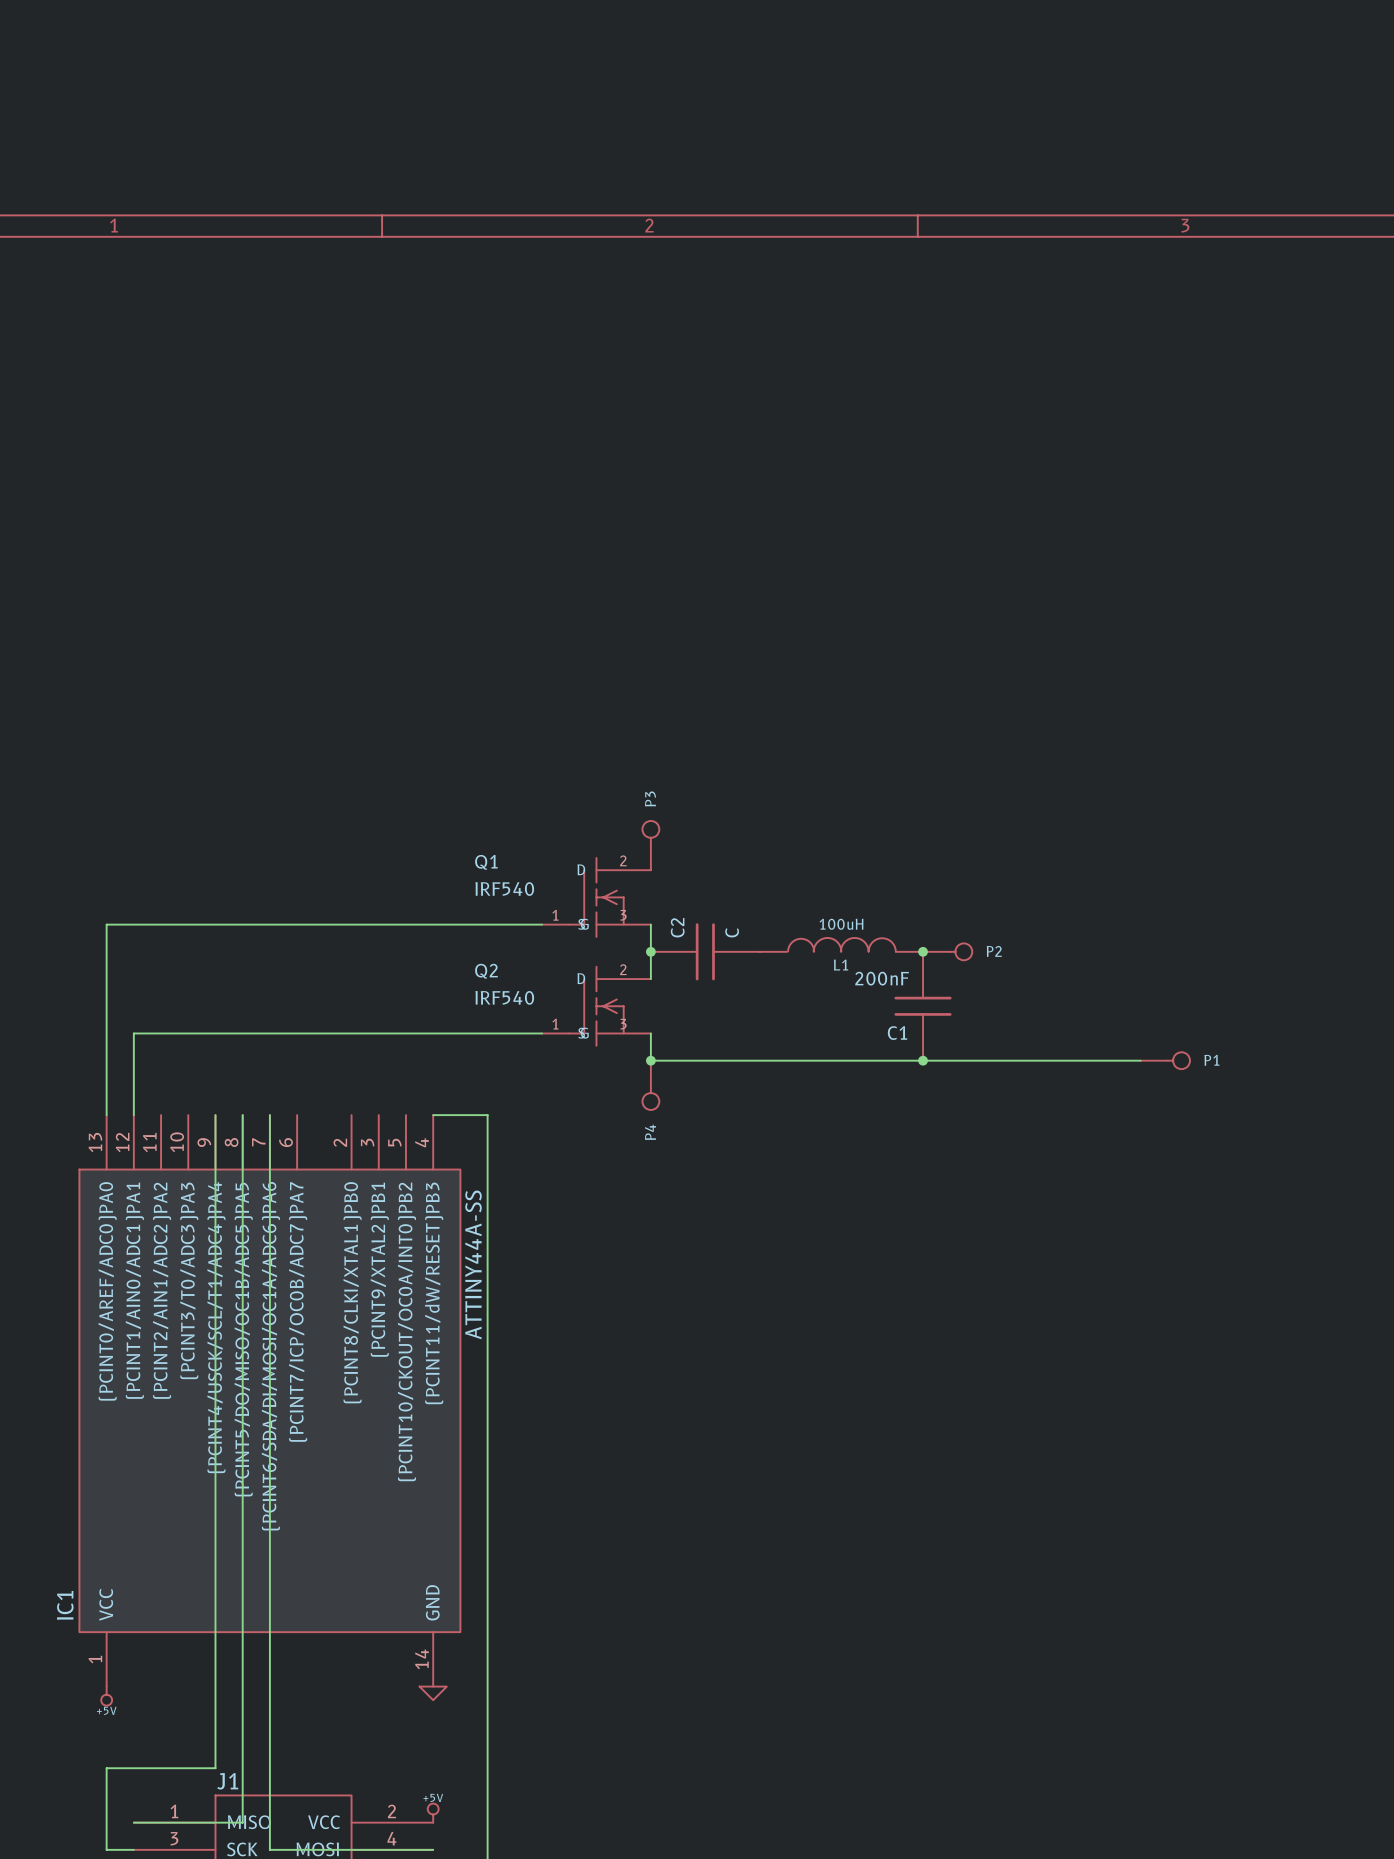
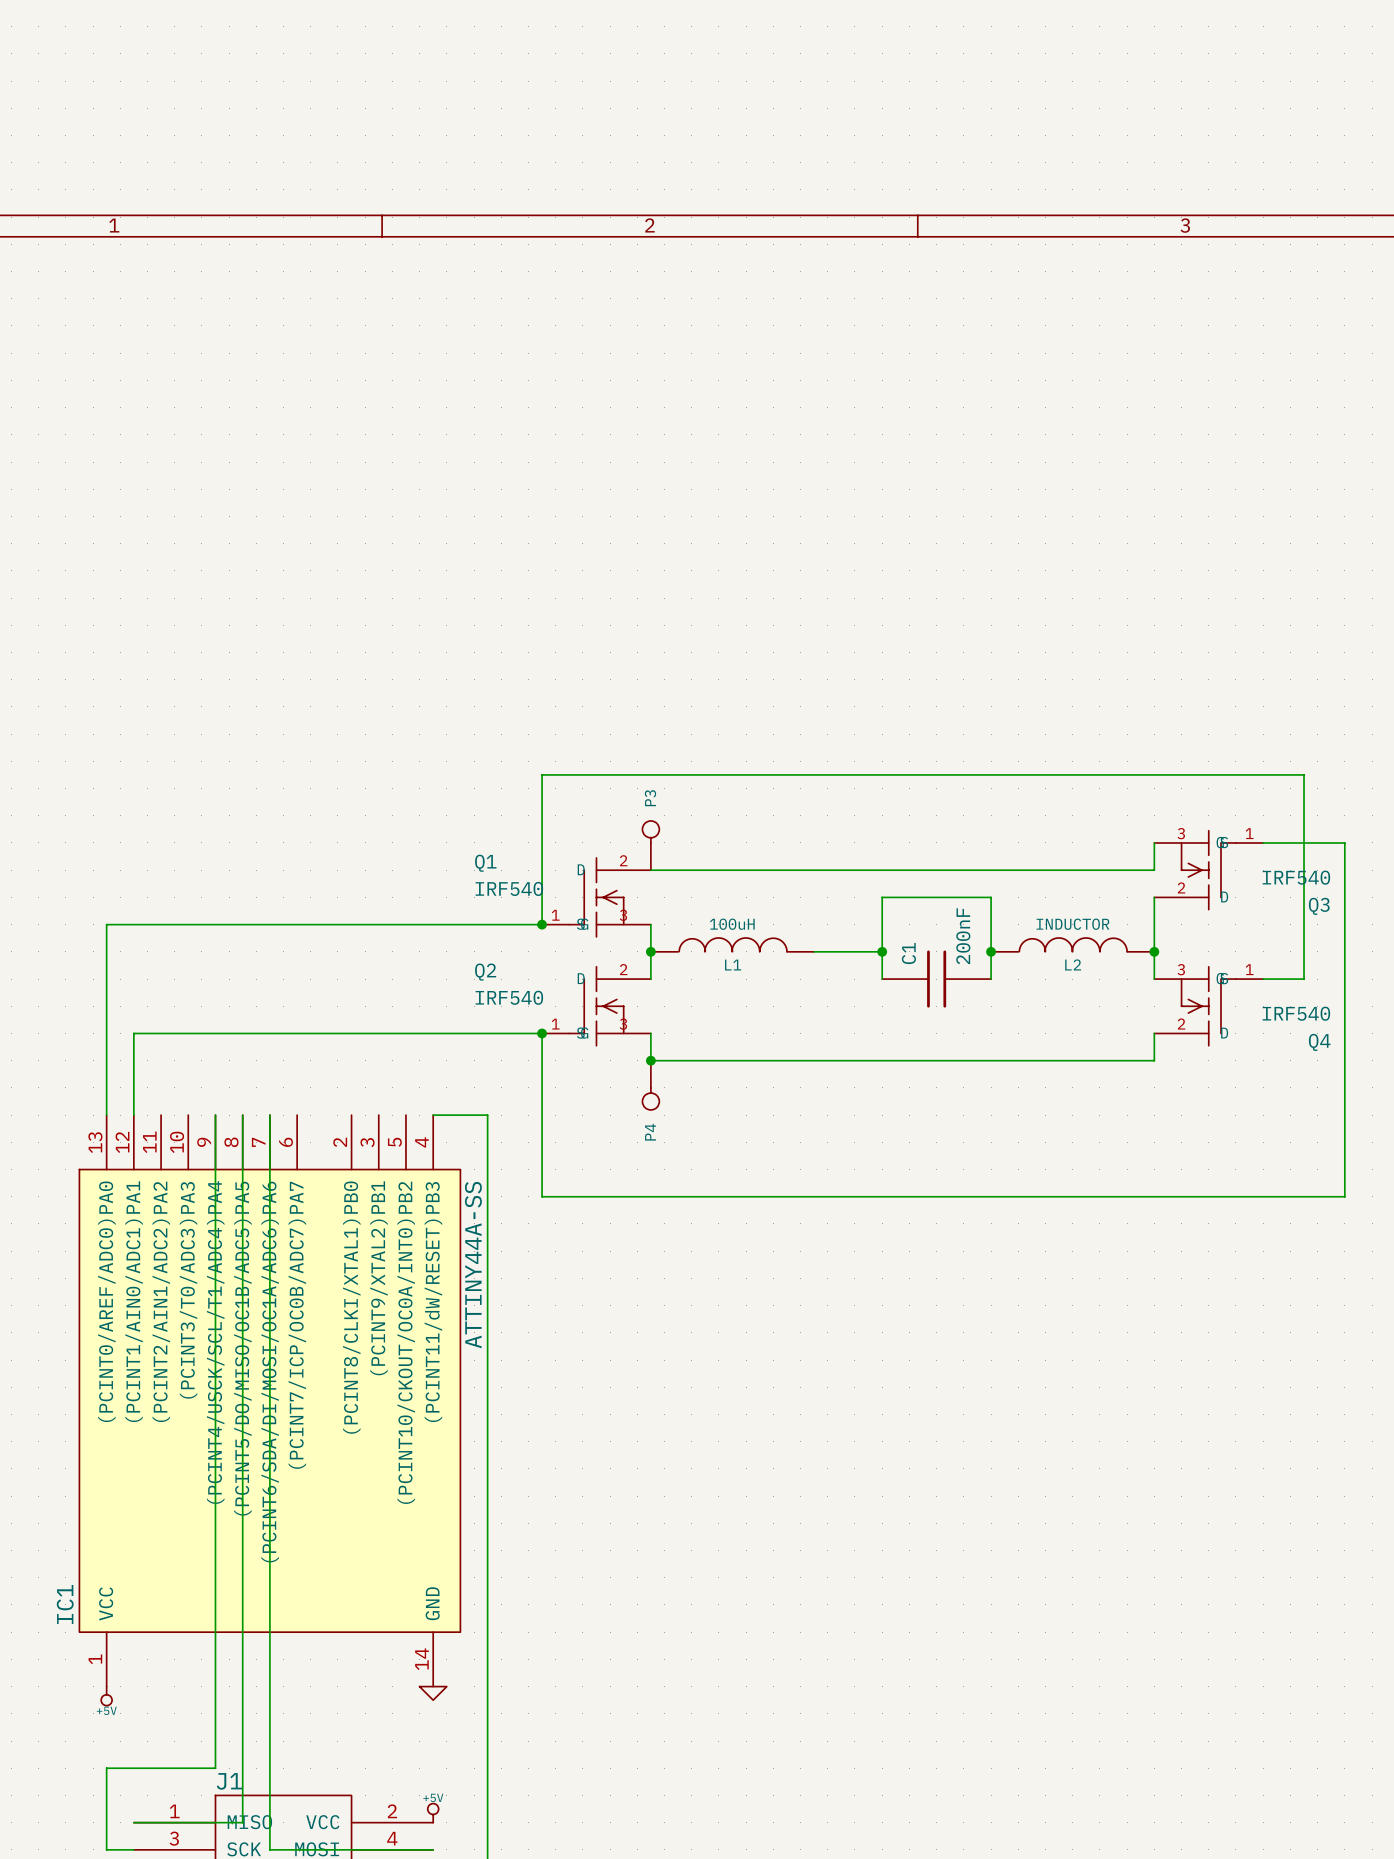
wire: none -> (1154, 842) (1154, 870) (650, 870)
wire: none -> (1263, 842) (1344, 842) (1344, 1196) (542, 1196) (542, 1033)
Q3: none -> IRF540 (1208, 870)
wire: none -> (1154, 897) (1154, 979)
wire: none -> (542, 924) (542, 774) (1304, 774) (1304, 979) (1263, 979)
junction: none -> (542, 924)
L1 position: (841, 944) -> (732, 944)
L2: none -> INDUCTOR (1072, 944)
C2: C (705, 951) -> none
wire: none -> (814, 951) (882, 951)
junction: none -> (882, 951)
junction: (923, 951) -> none
P2: (947, 951) -> none
junction: none -> (991, 951)
junction: none -> (1154, 951)
wire: none -> (882, 979) (882, 897) (991, 897) (991, 979)
C1 rotation: 0° (923, 1006) -> 90° clockwise (936, 979)
Q4: none -> IRF540 (1208, 1006)
junction: none -> (542, 1033)
wire: none -> (1154, 1033) (1154, 1060) (1140, 1060)
junction: (923, 1060) -> none
P1: (1165, 1060) -> none

